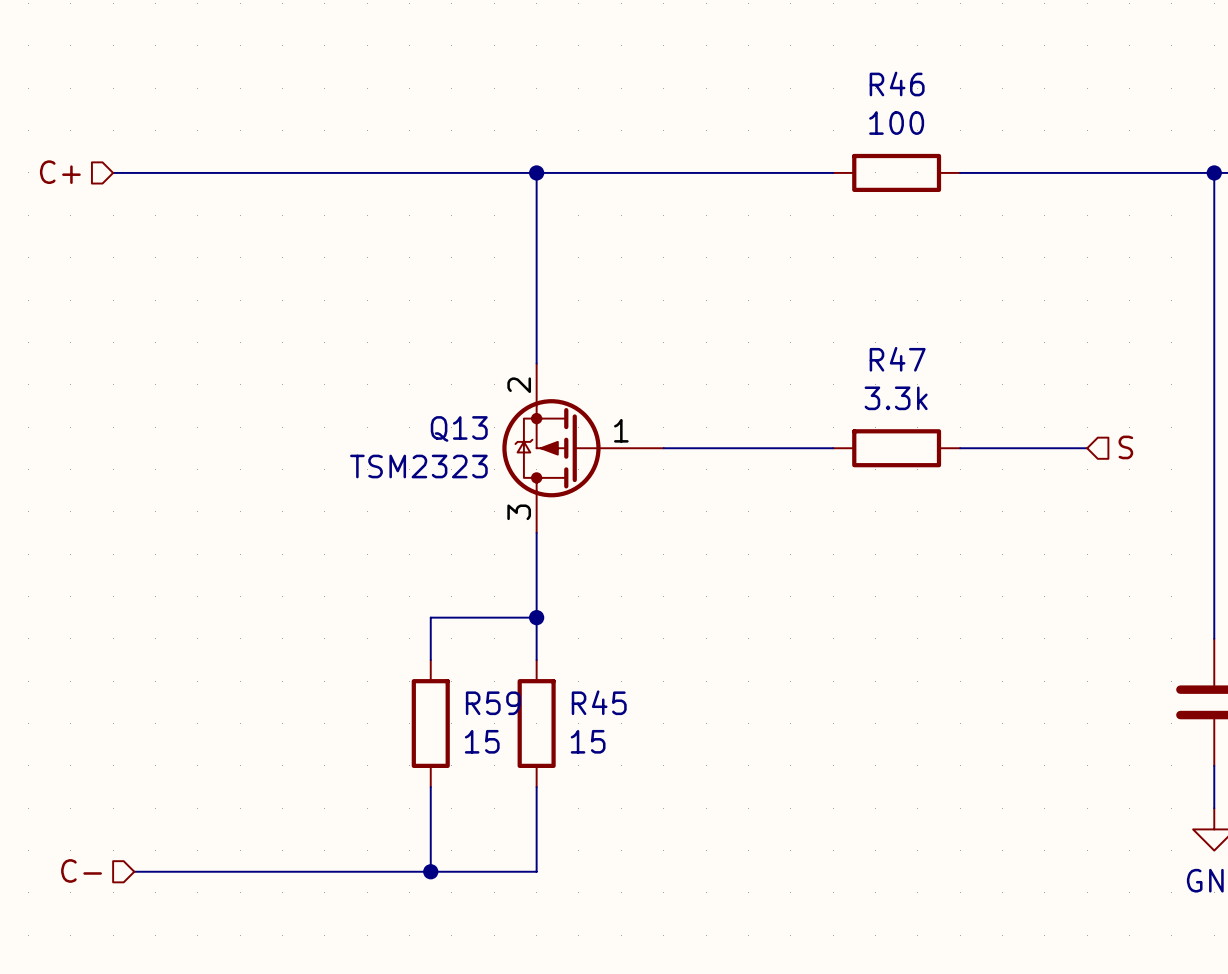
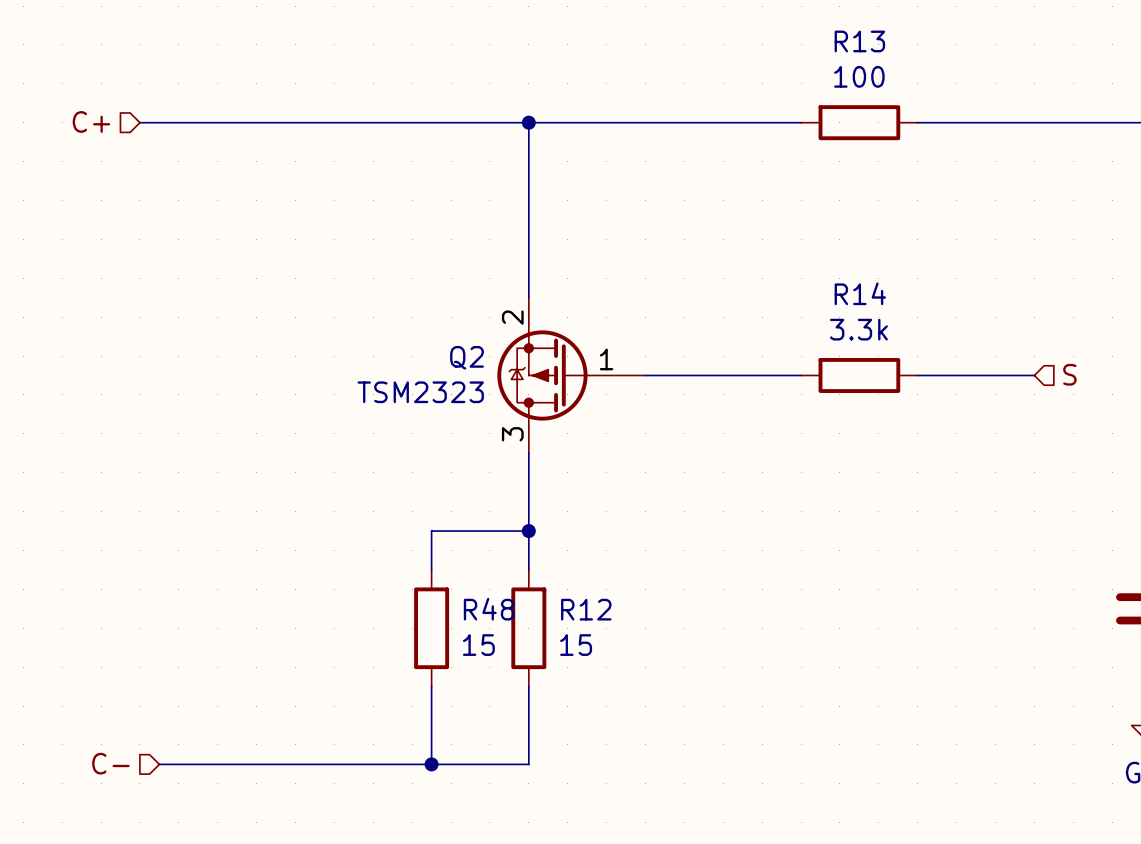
R46 name: R46 (897, 83) -> R13 (859, 41)
R47 name: R47 (897, 359) -> R14 (860, 293)
Q13 name: Q13 (459, 428) -> Q2 (467, 357)
R45 name: R45 (599, 702) -> R12 (586, 609)
R59 name: R59 (493, 703) -> R48 (489, 609)

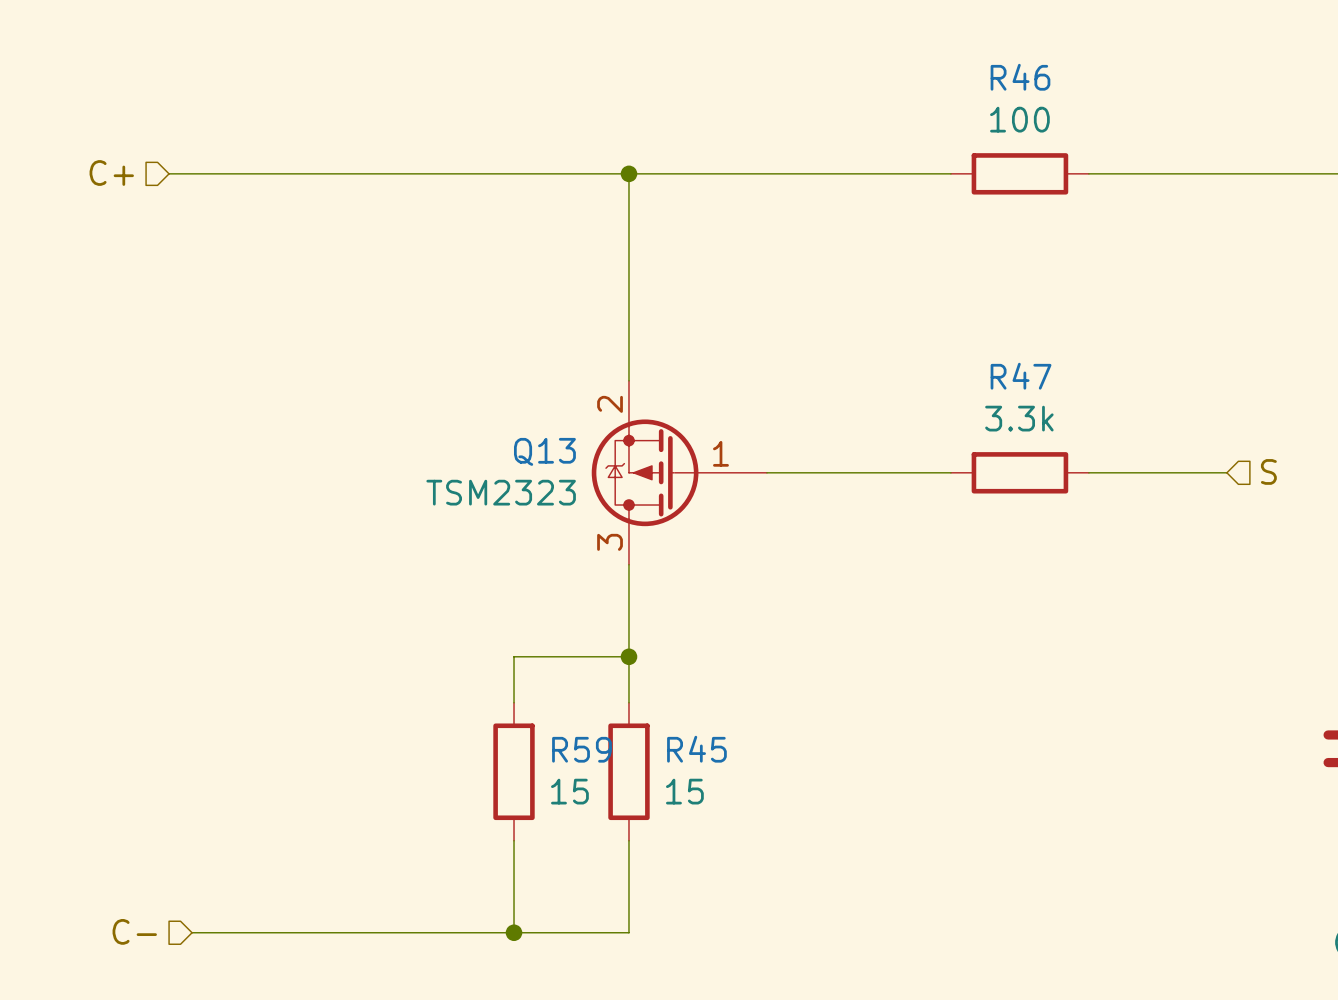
R13 name: R13 (859, 41) -> R46 (1020, 77)
R14 name: R14 (860, 293) -> R47 (1021, 376)
Q2 name: Q2 (467, 357) -> Q13 (544, 451)
R48 name: R48 (489, 609) -> R59 (581, 749)
R12 name: R12 (586, 609) -> R45 (696, 749)

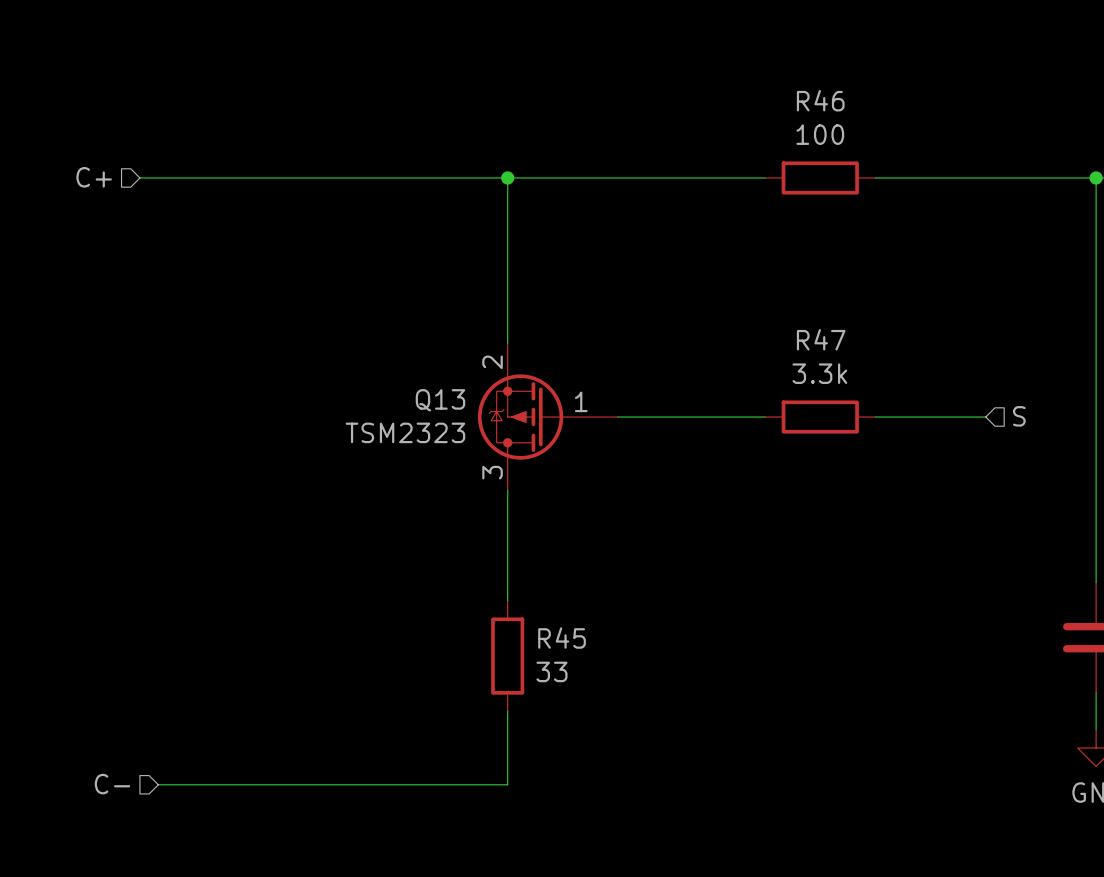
wire: (628, 656) (514, 656) (514, 702) -> none
junction: (628, 656) -> none
R59: 15 (514, 771) -> none
R45 value: 15 (684, 791) -> 33 (551, 671)
wire: (514, 840) (514, 932) -> none
junction: (514, 932) -> none

